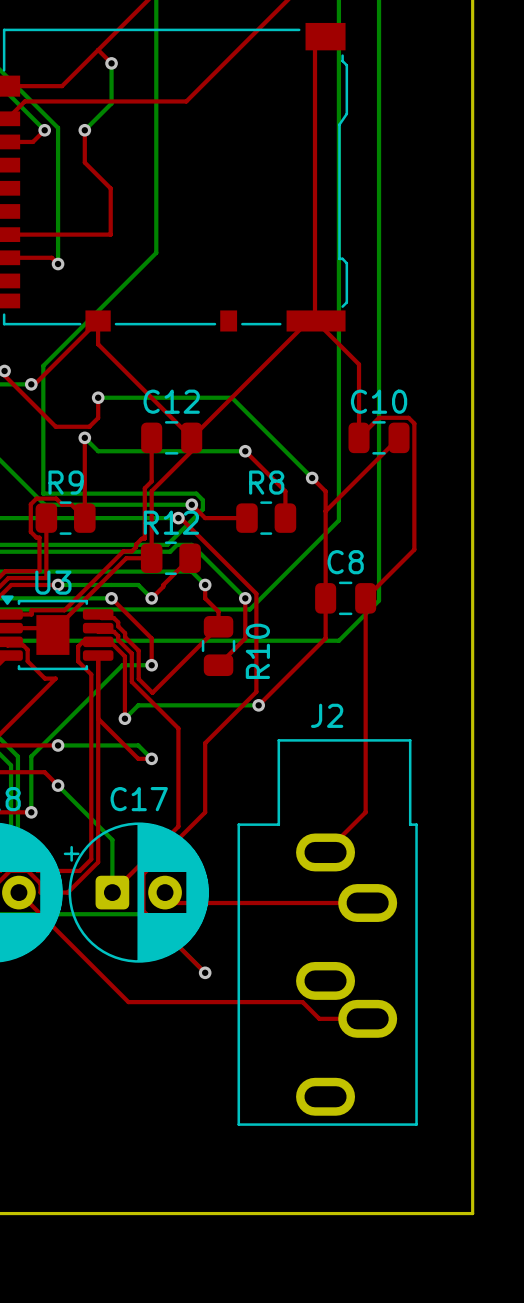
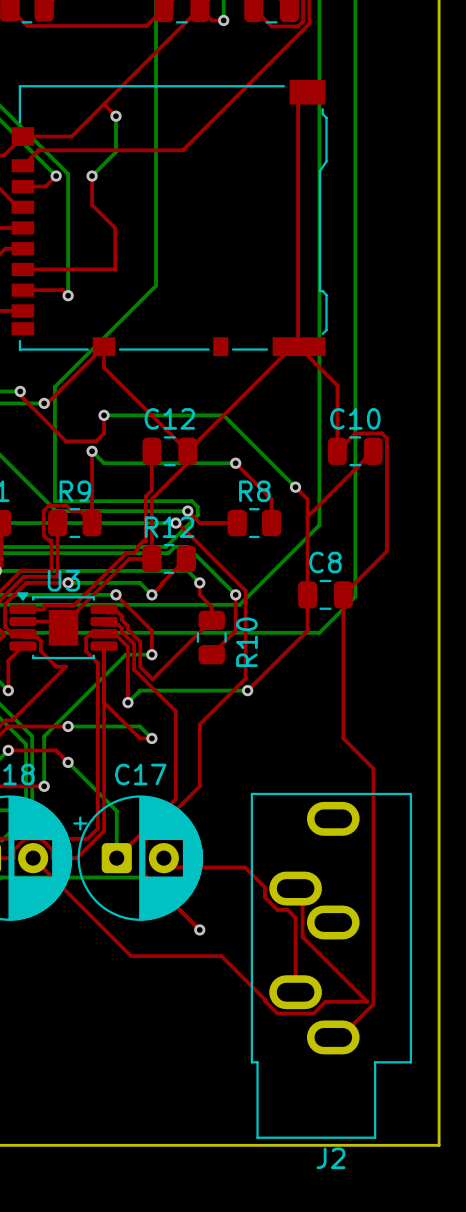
top track: (365, 758) (365, 812) (325, 852) -> (343, 738) (373, 768) (373, 1004) (340, 1037) (333, 1037)
top track: (255, 903) (367, 903) -> (244, 867) (264, 887) (264, 897) (277, 909) (287, 909) (295, 918) (295, 992)
J2 rotation: 0° (327, 932) -> 180° (331, 965)
top track: (229, 1002) (302, 1002) (319, 1018) (367, 1018) -> (221, 956) (277, 1013) (313, 1013) (325, 1001) (367, 1001) (302, 937) (302, 895) (295, 888)

